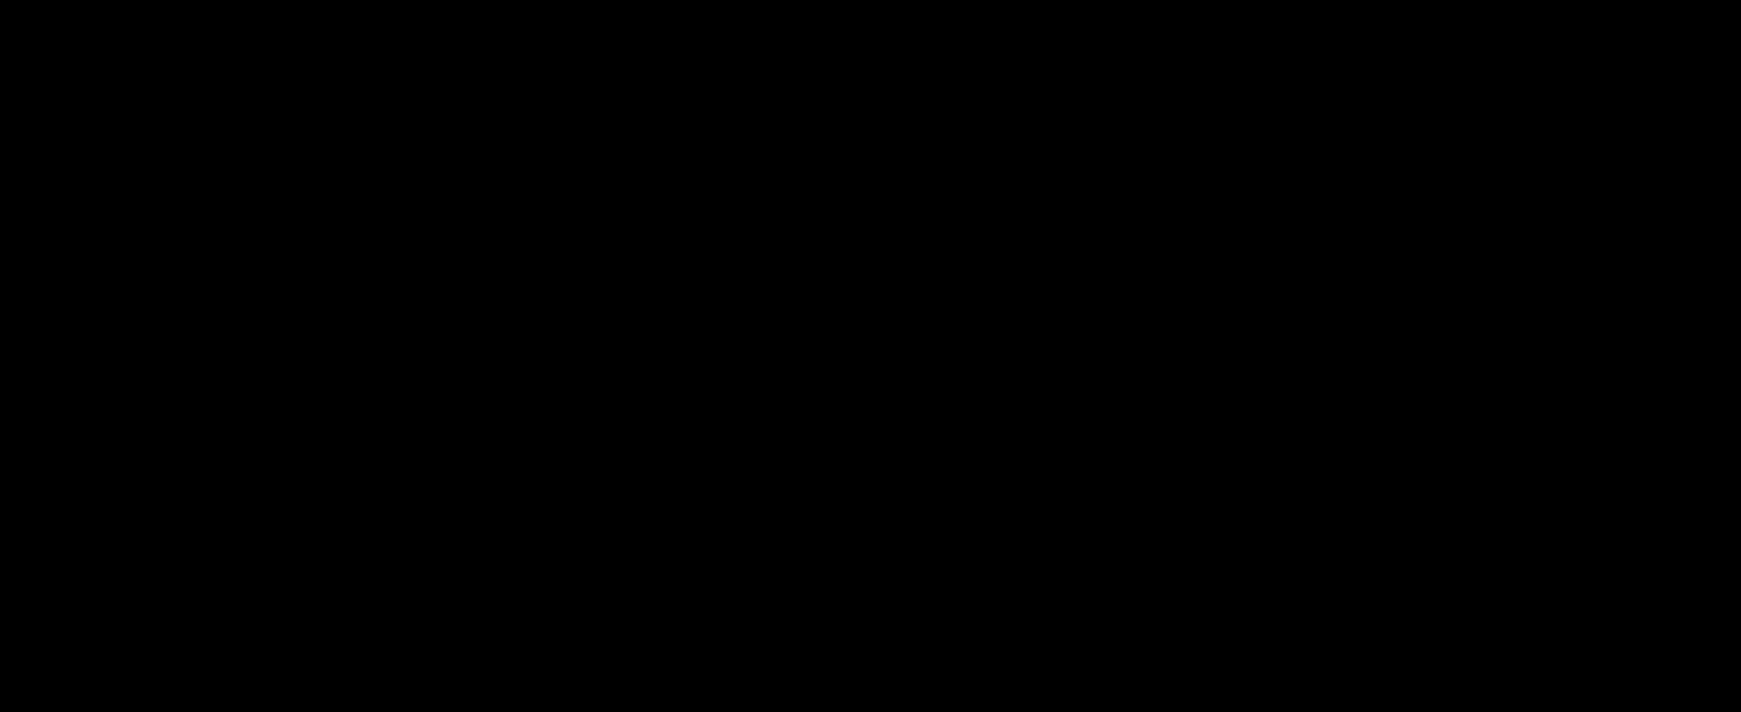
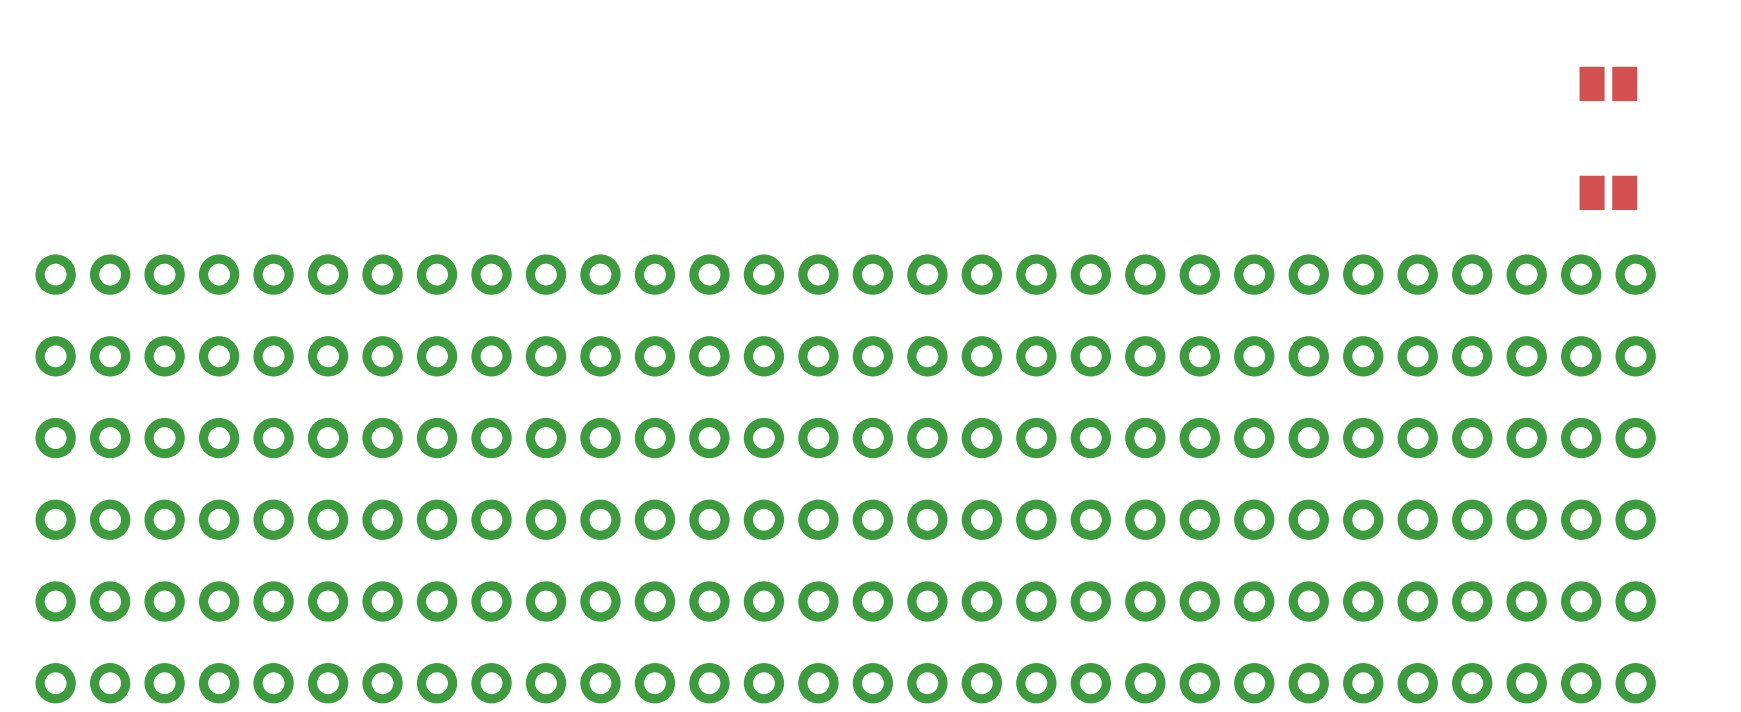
part: none -> (1608, 83)
part: none -> (1608, 192)
part: none -> (845, 274)
part: none -> (845, 356)
part: none -> (845, 438)
part: none -> (845, 519)
part: none -> (845, 601)
part: none -> (845, 683)

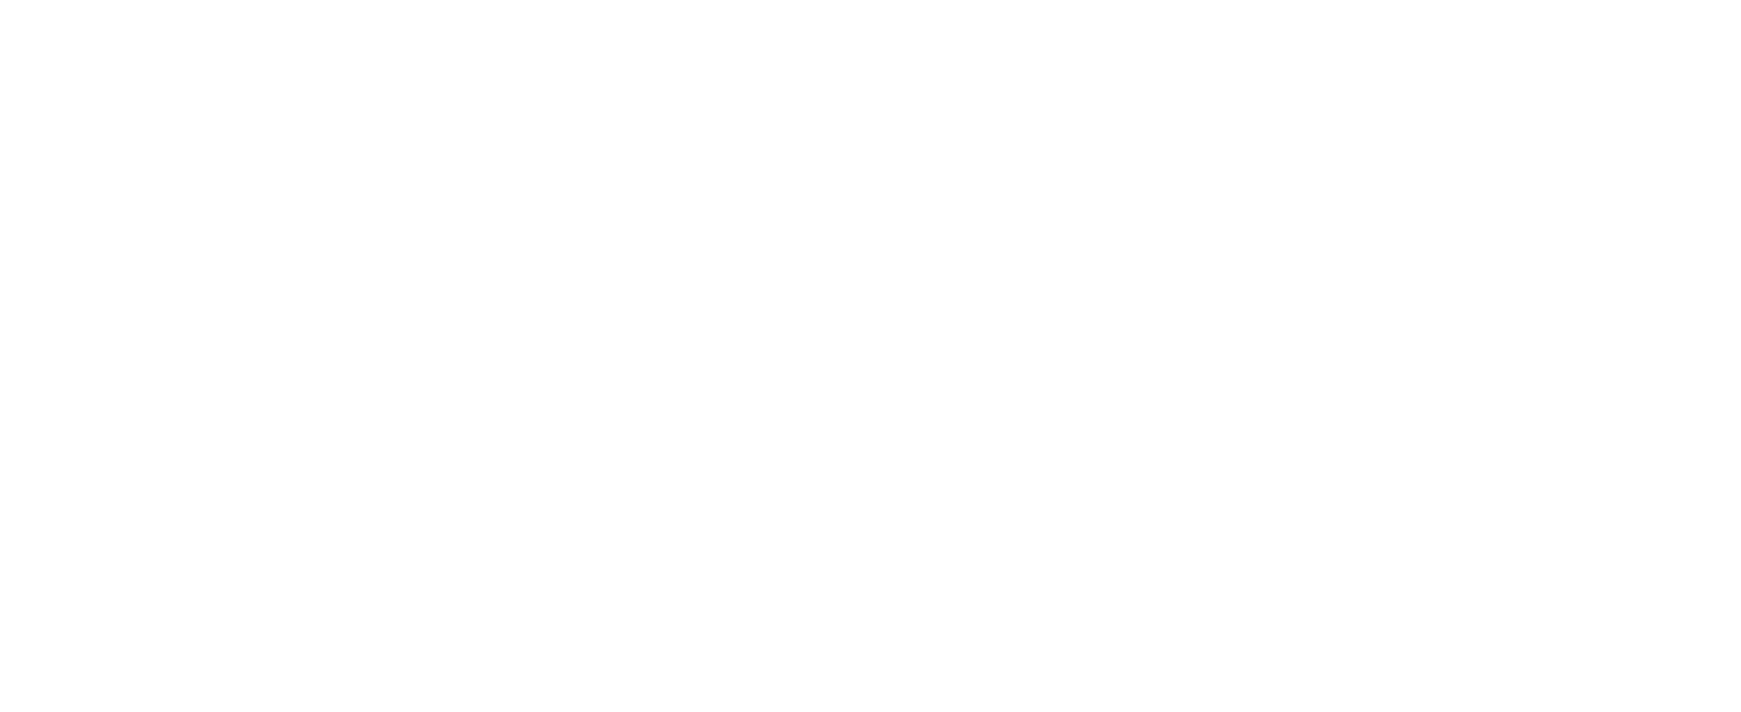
part: (1608, 83) -> none
part: (1608, 192) -> none
part: (845, 274) -> none
part: (845, 356) -> none
part: (845, 438) -> none
part: (845, 519) -> none
part: (845, 601) -> none
part: (845, 683) -> none

